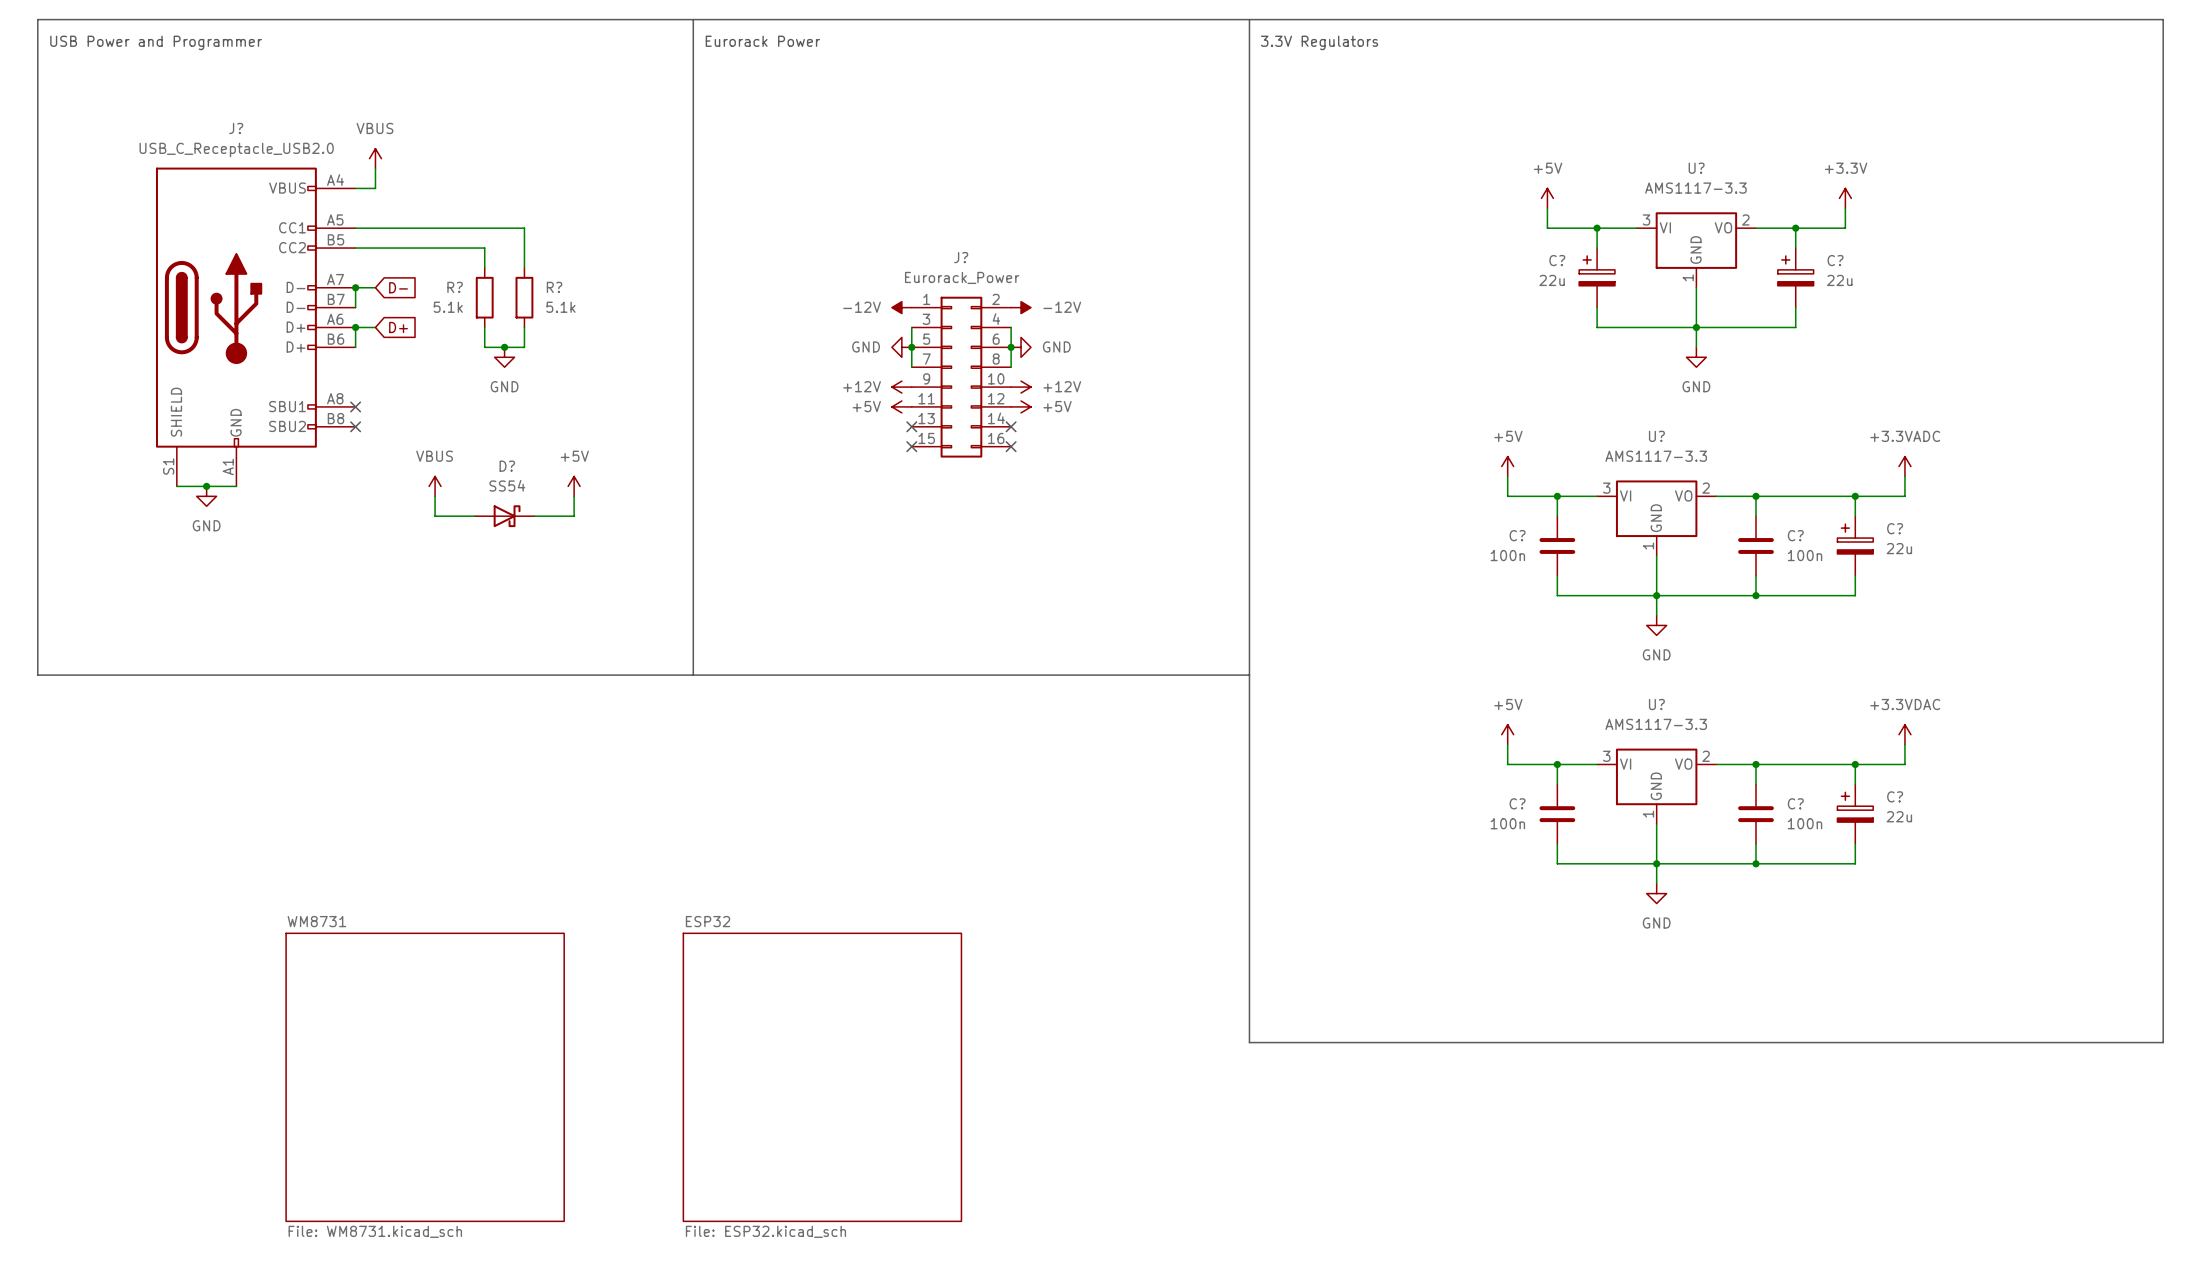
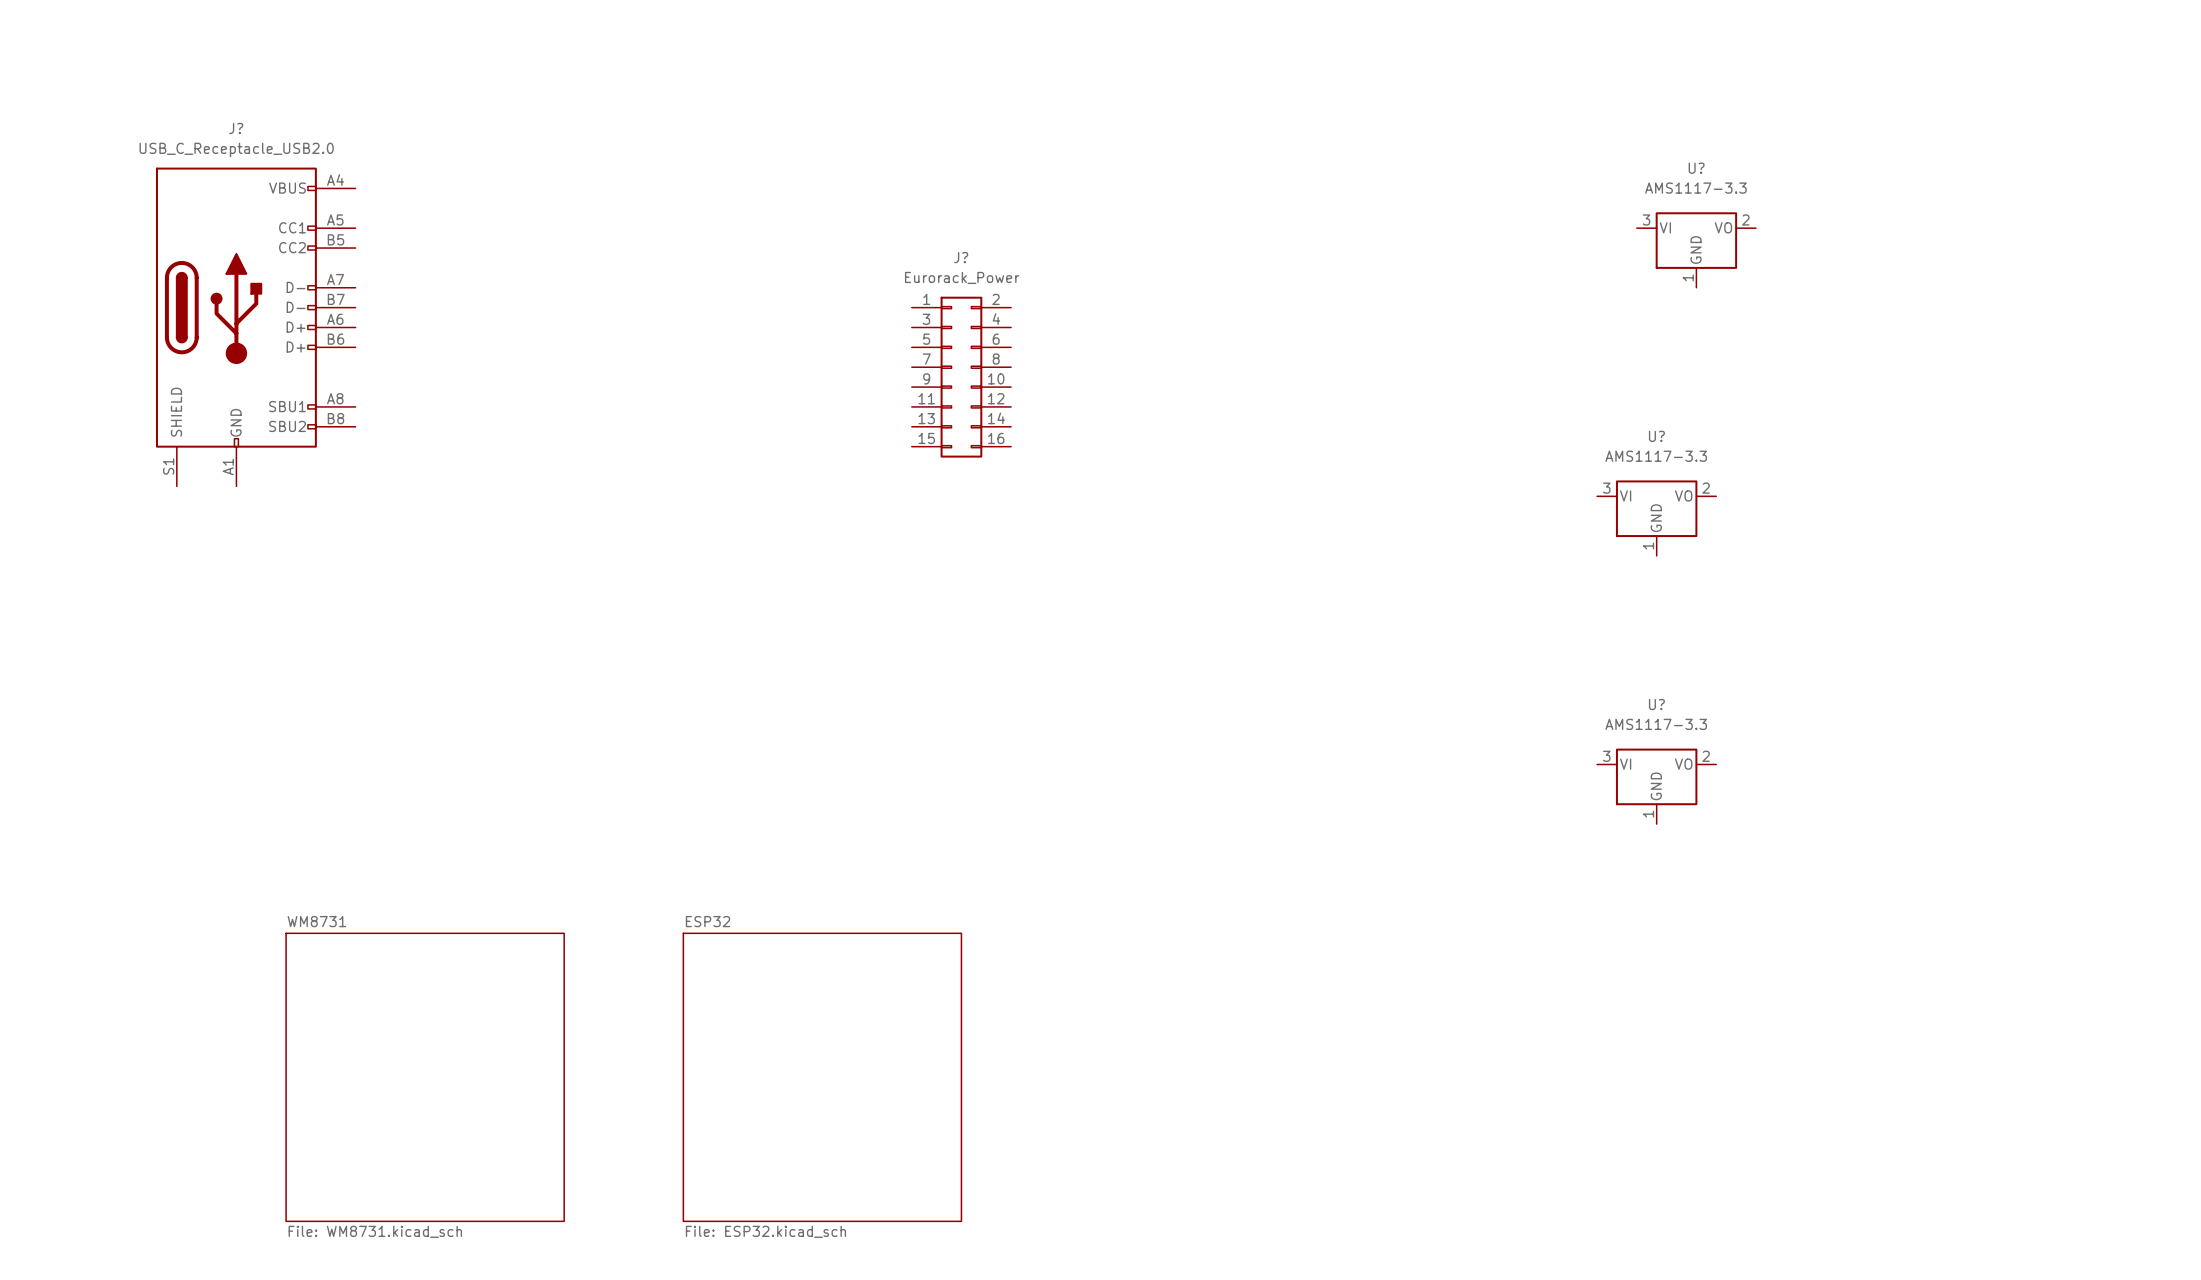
line: (693, 19) (693, 675) -> none
line: (1249, 19) (1249, 1042) (2163, 1042) (2163, 19) (37, 19) (37, 675) (1249, 675) -> none
text: Eurorack Power (762, 41) -> none
text: USB Power and Programmer (156, 42) -> none
text: 3.3V Regulators (1319, 42) -> none
power symbol: VBUS (375, 158) -> none
wire: (375, 168) (375, 188) (355, 188) -> none
power symbol: +5V (1547, 198) -> none
power symbol: +3.3V (1845, 198) -> none
wire: (1547, 208) (1547, 228) (1636, 228) -> none
wire: (1845, 208) (1845, 228) (1755, 228) -> none
wire: (355, 228) (524, 228) (524, 267) -> none
wire: (1597, 228) (1597, 248) -> none
junction: (1597, 228) -> none
wire: (1795, 228) (1795, 248) -> none
junction: (1795, 228) -> none
wire: (355, 248) (484, 248) (484, 267) -> none
C?: 22u (1597, 277) -> none
C?: 22u (1795, 277) -> none
junction: (355, 287) -> none
wire: (375, 287) (355, 287) (355, 307) -> none
global label: D- (398, 287) -> none
wire: (1696, 287) (1696, 347) -> none
R?: 5.1k (484, 297) -> none
R?: 5.1k (524, 297) -> none
power symbol: -12V (901, 307) -> none
power symbol: -12V (1021, 307) -> none
wire: (1597, 307) (1597, 327) (1795, 327) (1795, 307) -> none
junction: (355, 327) -> none
wire: (375, 327) (355, 327) (355, 347) -> none
global label: D+ (398, 327) -> none
wire: (484, 327) (484, 347) (524, 347) (524, 327) -> none
wire: (911, 327) (911, 367) -> none
wire: (1011, 327) (1011, 367) -> none
junction: (1696, 327) -> none
junction: (504, 347) -> none
power symbol: GND (901, 347) -> none
junction: (911, 347) -> none
junction: (1011, 347) -> none
power symbol: GND (1021, 347) -> none
power symbol: GND (504, 357) -> none
power symbol: GND (1696, 357) -> none
power symbol: +12V (901, 387) -> none
power symbol: +12V (1021, 387) -> none
no-connect mark: (355, 406) -> none
power symbol: +5V (901, 406) -> none
power symbol: +5V (1021, 406) -> none
no-connect mark: (355, 426) -> none
no-connect mark: (911, 426) -> none
no-connect mark: (1011, 426) -> none
no-connect mark: (911, 446) -> none
no-connect mark: (1011, 446) -> none
power symbol: +5V (1507, 466) -> none
power symbol: +3.3VADC (1904, 466) -> none
wire: (1507, 476) (1507, 496) (1597, 496) -> none
wire: (1904, 476) (1904, 496) (1716, 496) -> none
wire: (176, 486) (236, 486) -> none
junction: (206, 486) -> none
power symbol: VBUS (435, 486) -> none
power symbol: +5V (574, 486) -> none
power symbol: GND (206, 496) -> none
wire: (435, 496) (435, 516) (474, 516) -> none
wire: (574, 496) (574, 516) (534, 516) -> none
wire: (1557, 496) (1557, 516) -> none
junction: (1557, 496) -> none
wire: (1755, 496) (1755, 516) -> none
junction: (1755, 496) -> none
wire: (1855, 496) (1855, 516) -> none
junction: (1855, 496) -> none
D?: SS54 (504, 516) -> none
C?: 100n (1557, 545) -> none
C?: 100n (1755, 545) -> none
C?: 22u (1855, 545) -> none
wire: (1656, 555) (1656, 615) -> none
wire: (1557, 575) (1557, 595) (1855, 595) (1855, 575) -> none
wire: (1755, 575) (1755, 595) -> none
junction: (1656, 595) -> none
junction: (1755, 595) -> none
power symbol: GND (1656, 625) -> none
power symbol: +5V (1507, 734) -> none
power symbol: +3.3VDAC (1904, 734) -> none
wire: (1507, 744) (1507, 764) (1597, 764) -> none
wire: (1904, 744) (1904, 764) (1716, 764) -> none
wire: (1557, 764) (1557, 784) -> none
junction: (1557, 764) -> none
wire: (1755, 764) (1755, 784) -> none
junction: (1755, 764) -> none
wire: (1855, 764) (1855, 784) -> none
junction: (1855, 764) -> none
C?: 100n (1557, 814) -> none
C?: 100n (1755, 814) -> none
C?: 22u (1855, 814) -> none
wire: (1656, 824) (1656, 883) -> none
wire: (1557, 843) (1557, 863) (1855, 863) (1855, 843) -> none
wire: (1755, 843) (1755, 863) -> none
junction: (1656, 863) -> none
junction: (1755, 863) -> none
power symbol: GND (1656, 893) -> none

